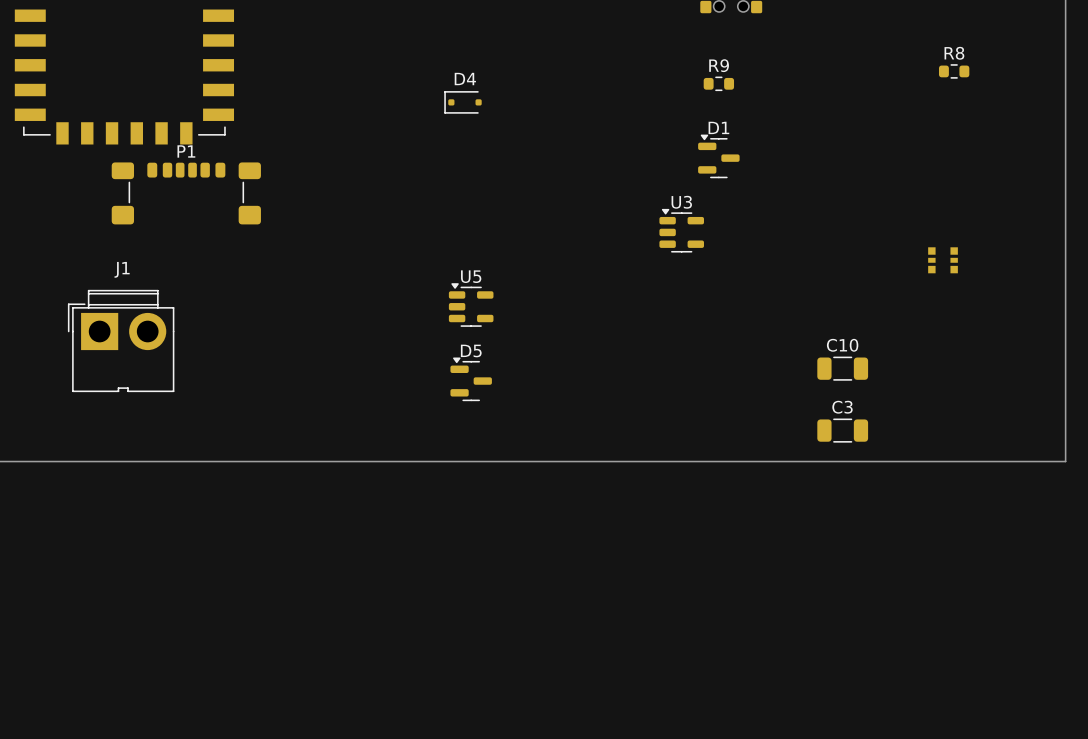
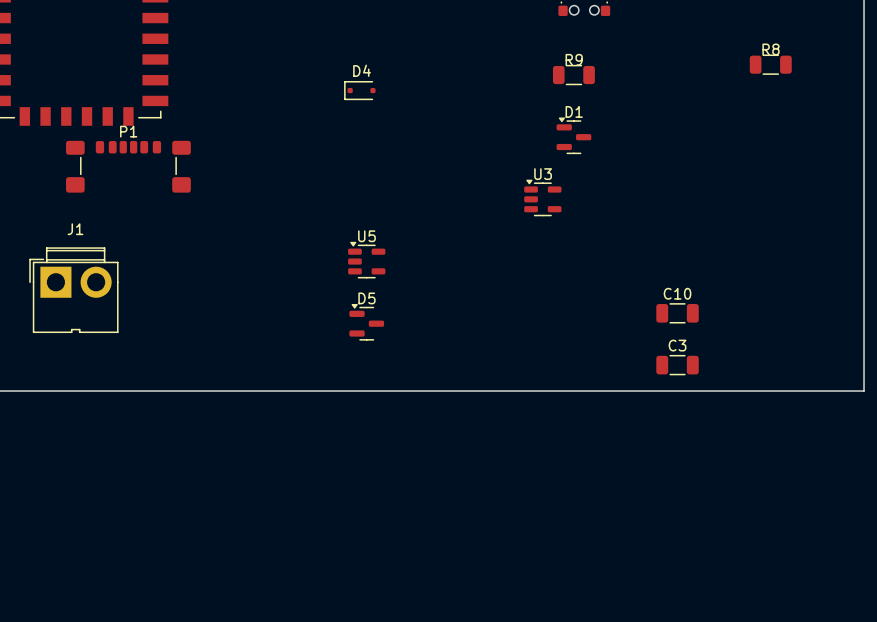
R8 footprint: [938, 64, 970, 79] -> [749, 54, 792, 75]
R9 footprint: [703, 76, 735, 92] -> [552, 64, 595, 86]
part: (943, 260) -> none

